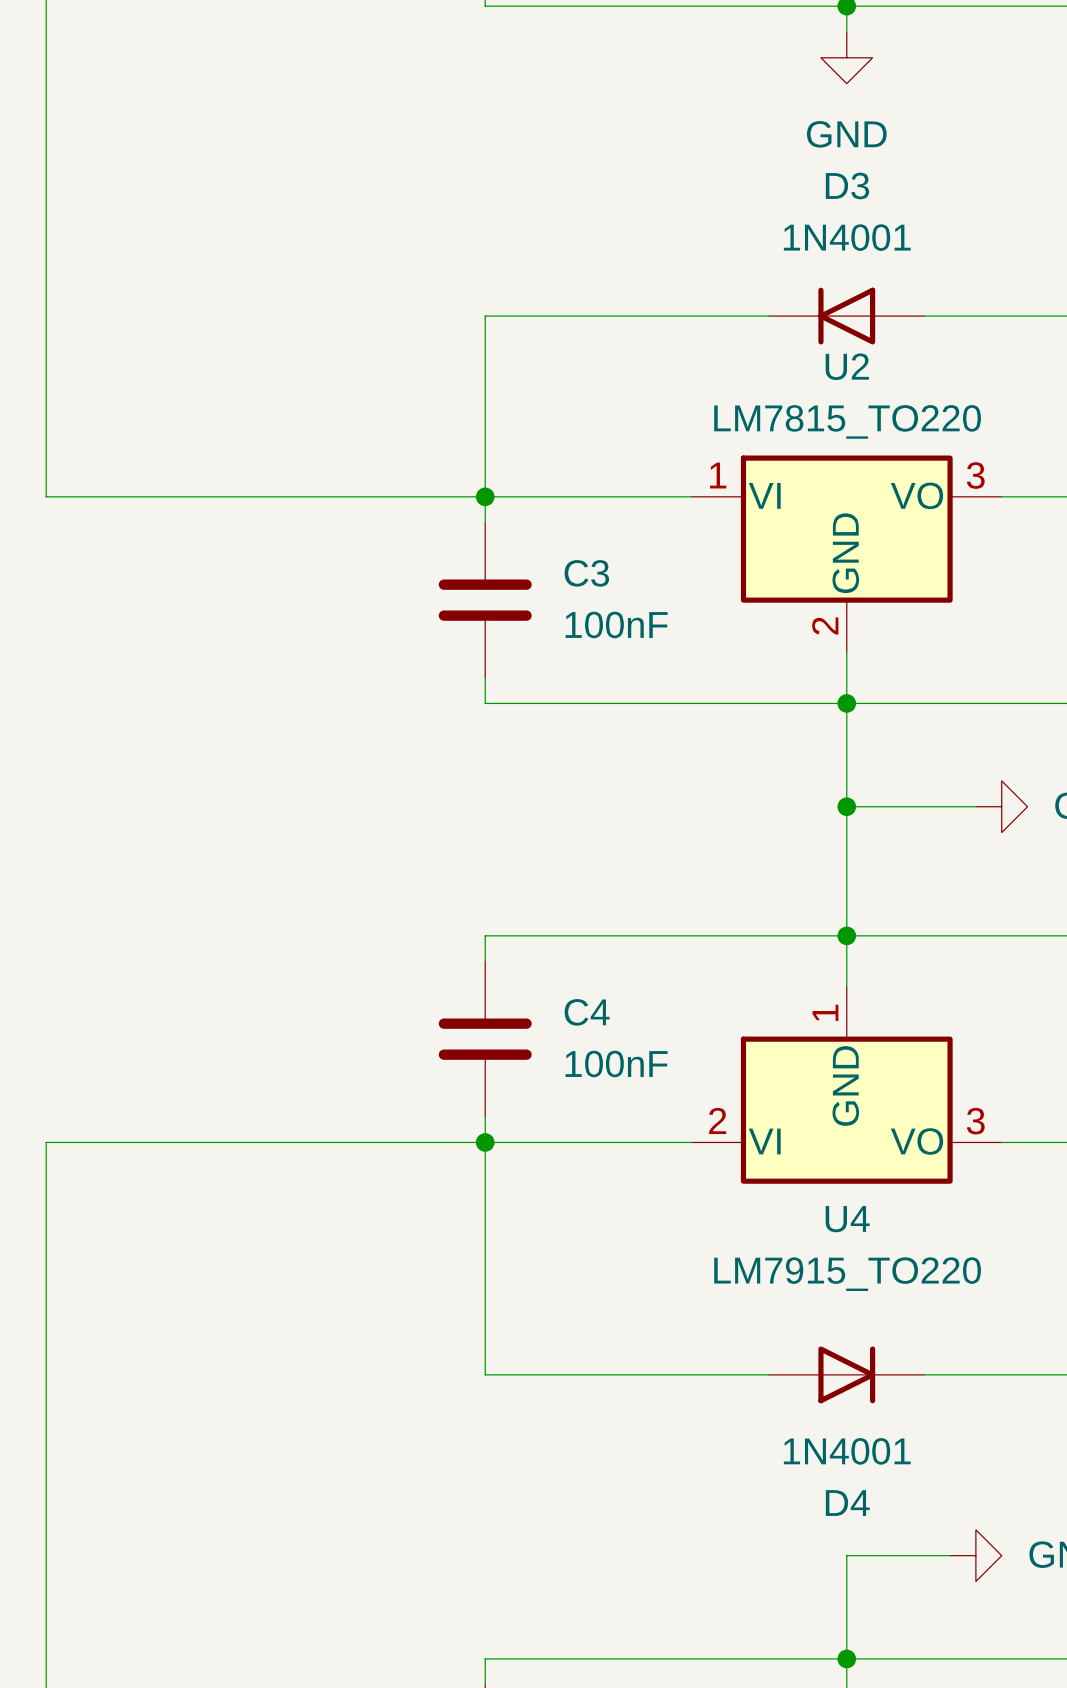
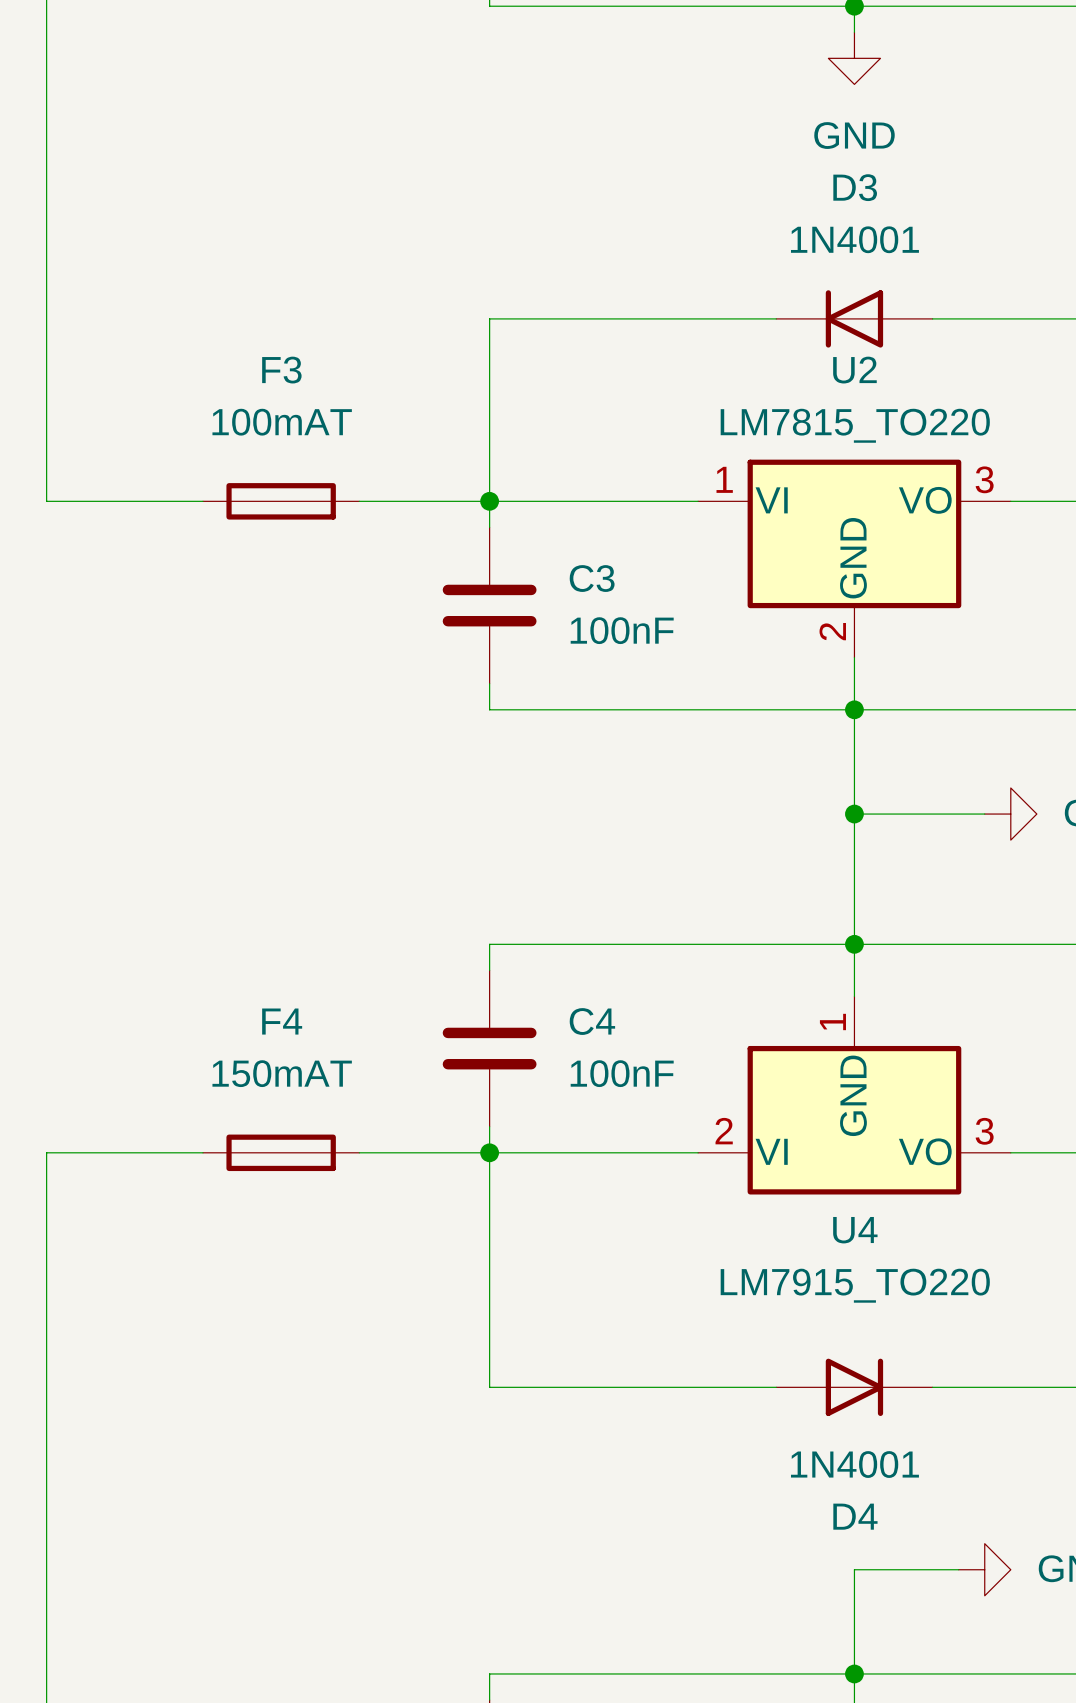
F3: none -> 100mAT (281, 501)
F4: none -> 150mAT (281, 1152)

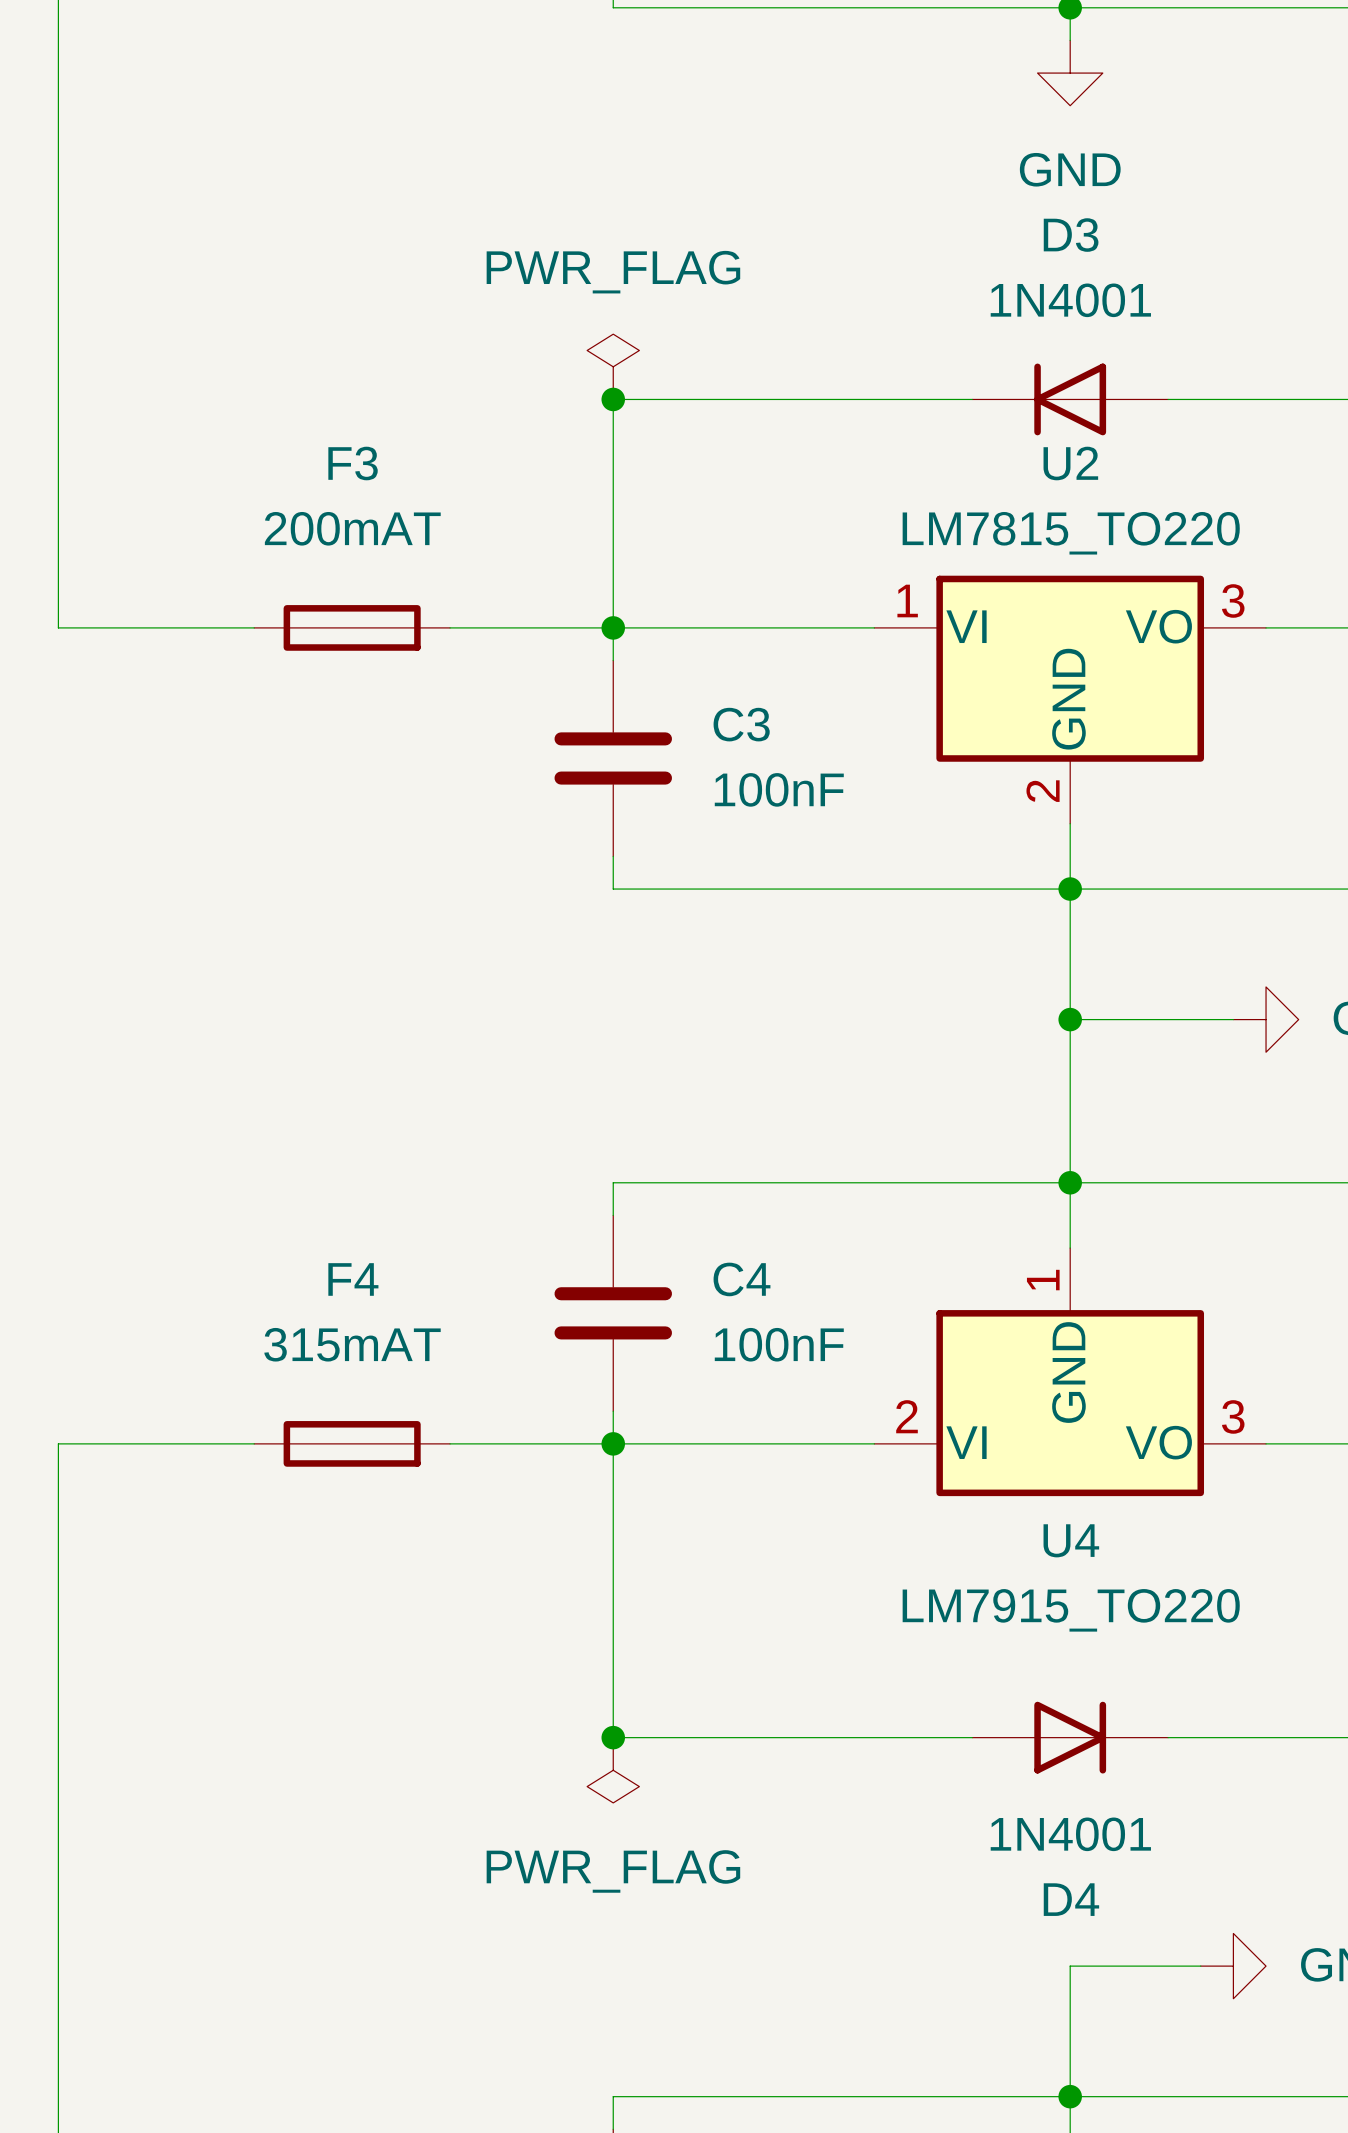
power symbol: none -> PWR_FLAG (613, 366)
junction: none -> (613, 399)
F3 value: 100mAT (282, 422) -> 200mAT (352, 528)
F4 value: 150mAT (282, 1073) -> 315mAT (352, 1344)
junction: none -> (613, 1737)
power symbol: none -> PWR_FLAG (613, 1770)

